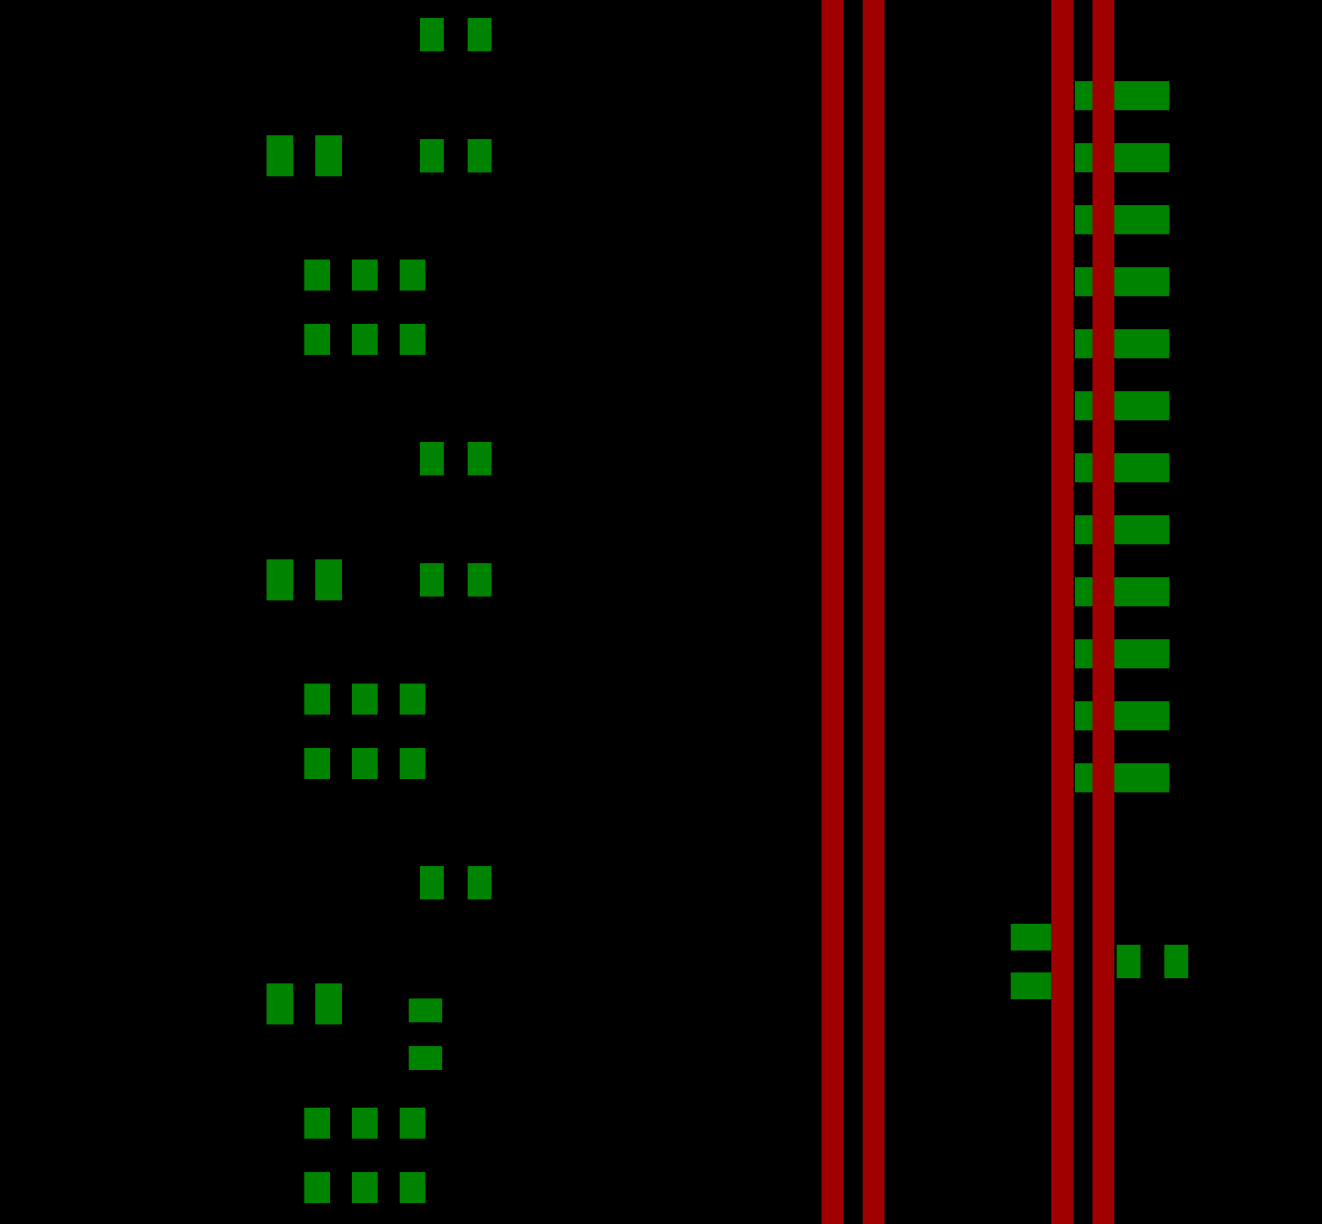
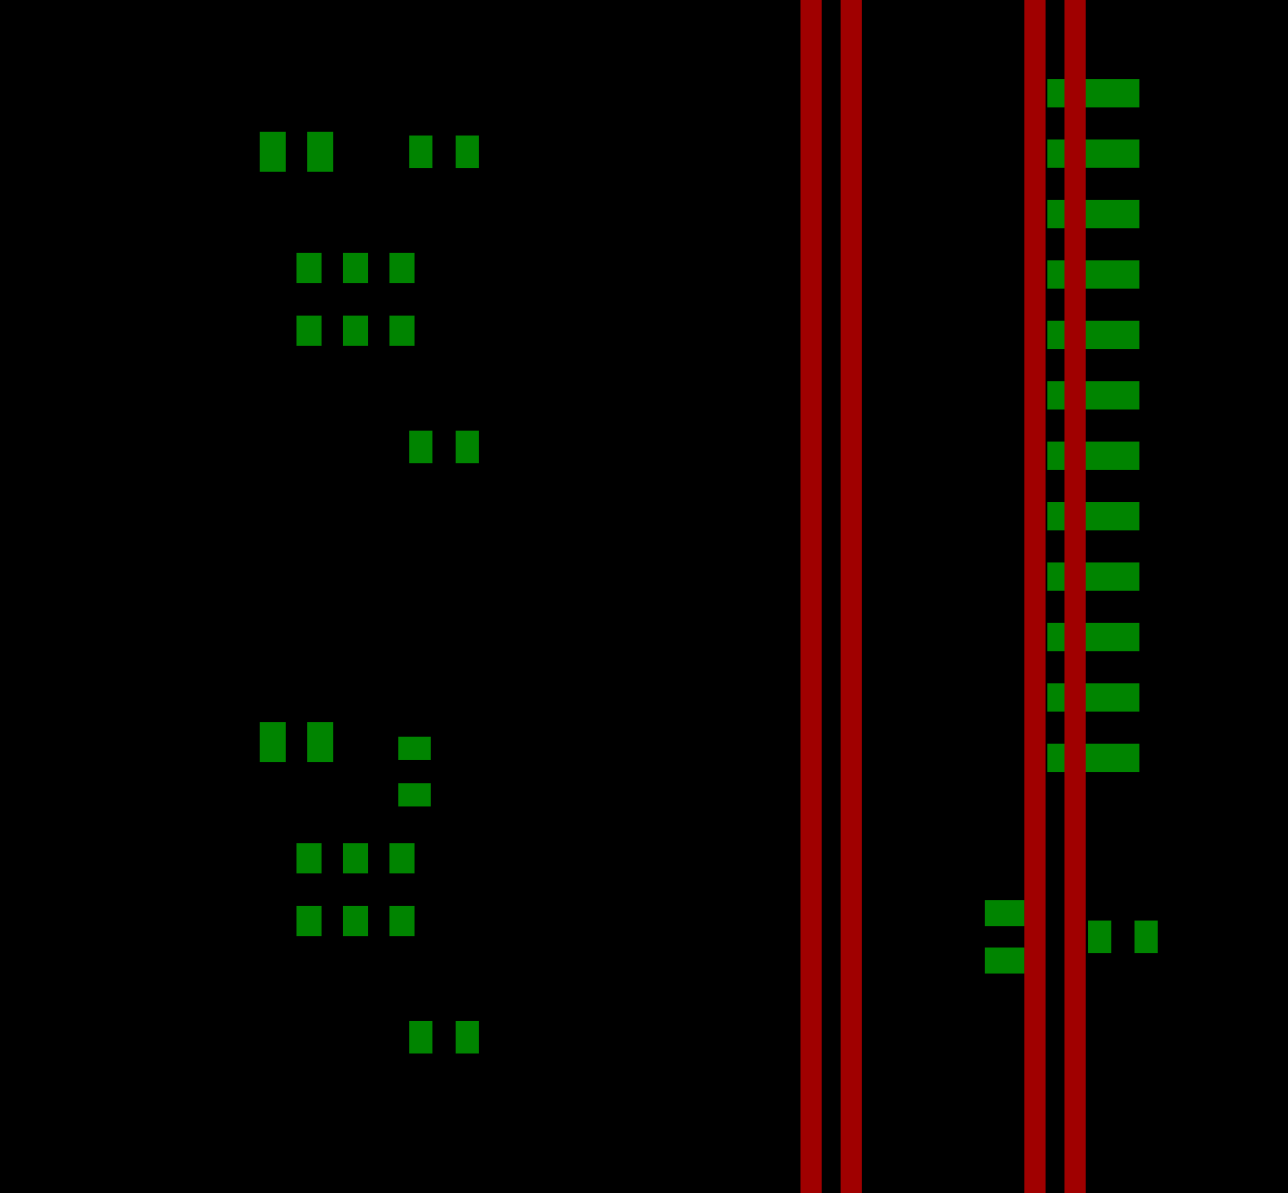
part: (455, 34) -> none
part: (304, 579) -> none
part: (455, 579) -> none
part: (364, 731) -> none
part: none -> (296, 742)
part rotation: 0° (455, 882) -> 90° clockwise (414, 771)
part position: (455, 882) -> (414, 771)
part: none -> (355, 889)
part: (304, 1003) -> none
part rotation: 0° (425, 1034) -> 90° clockwise (444, 1037)
part: (364, 1155) -> none

